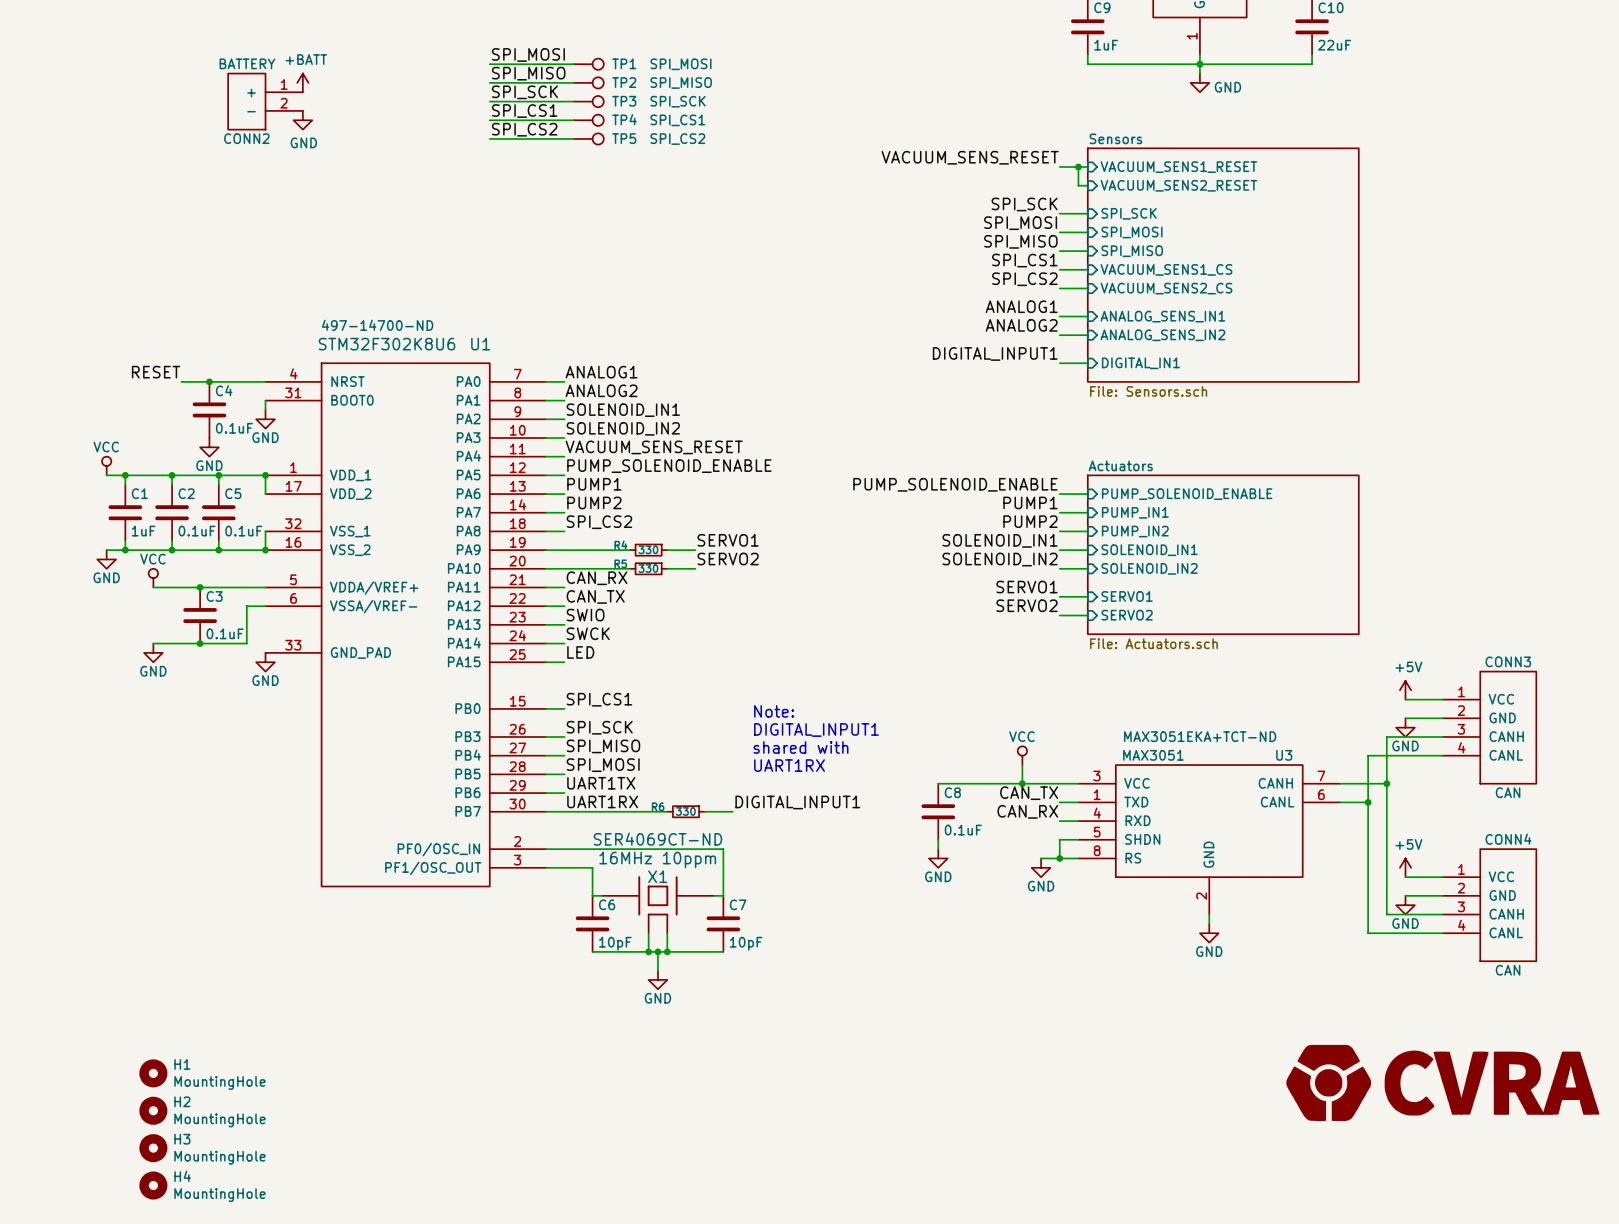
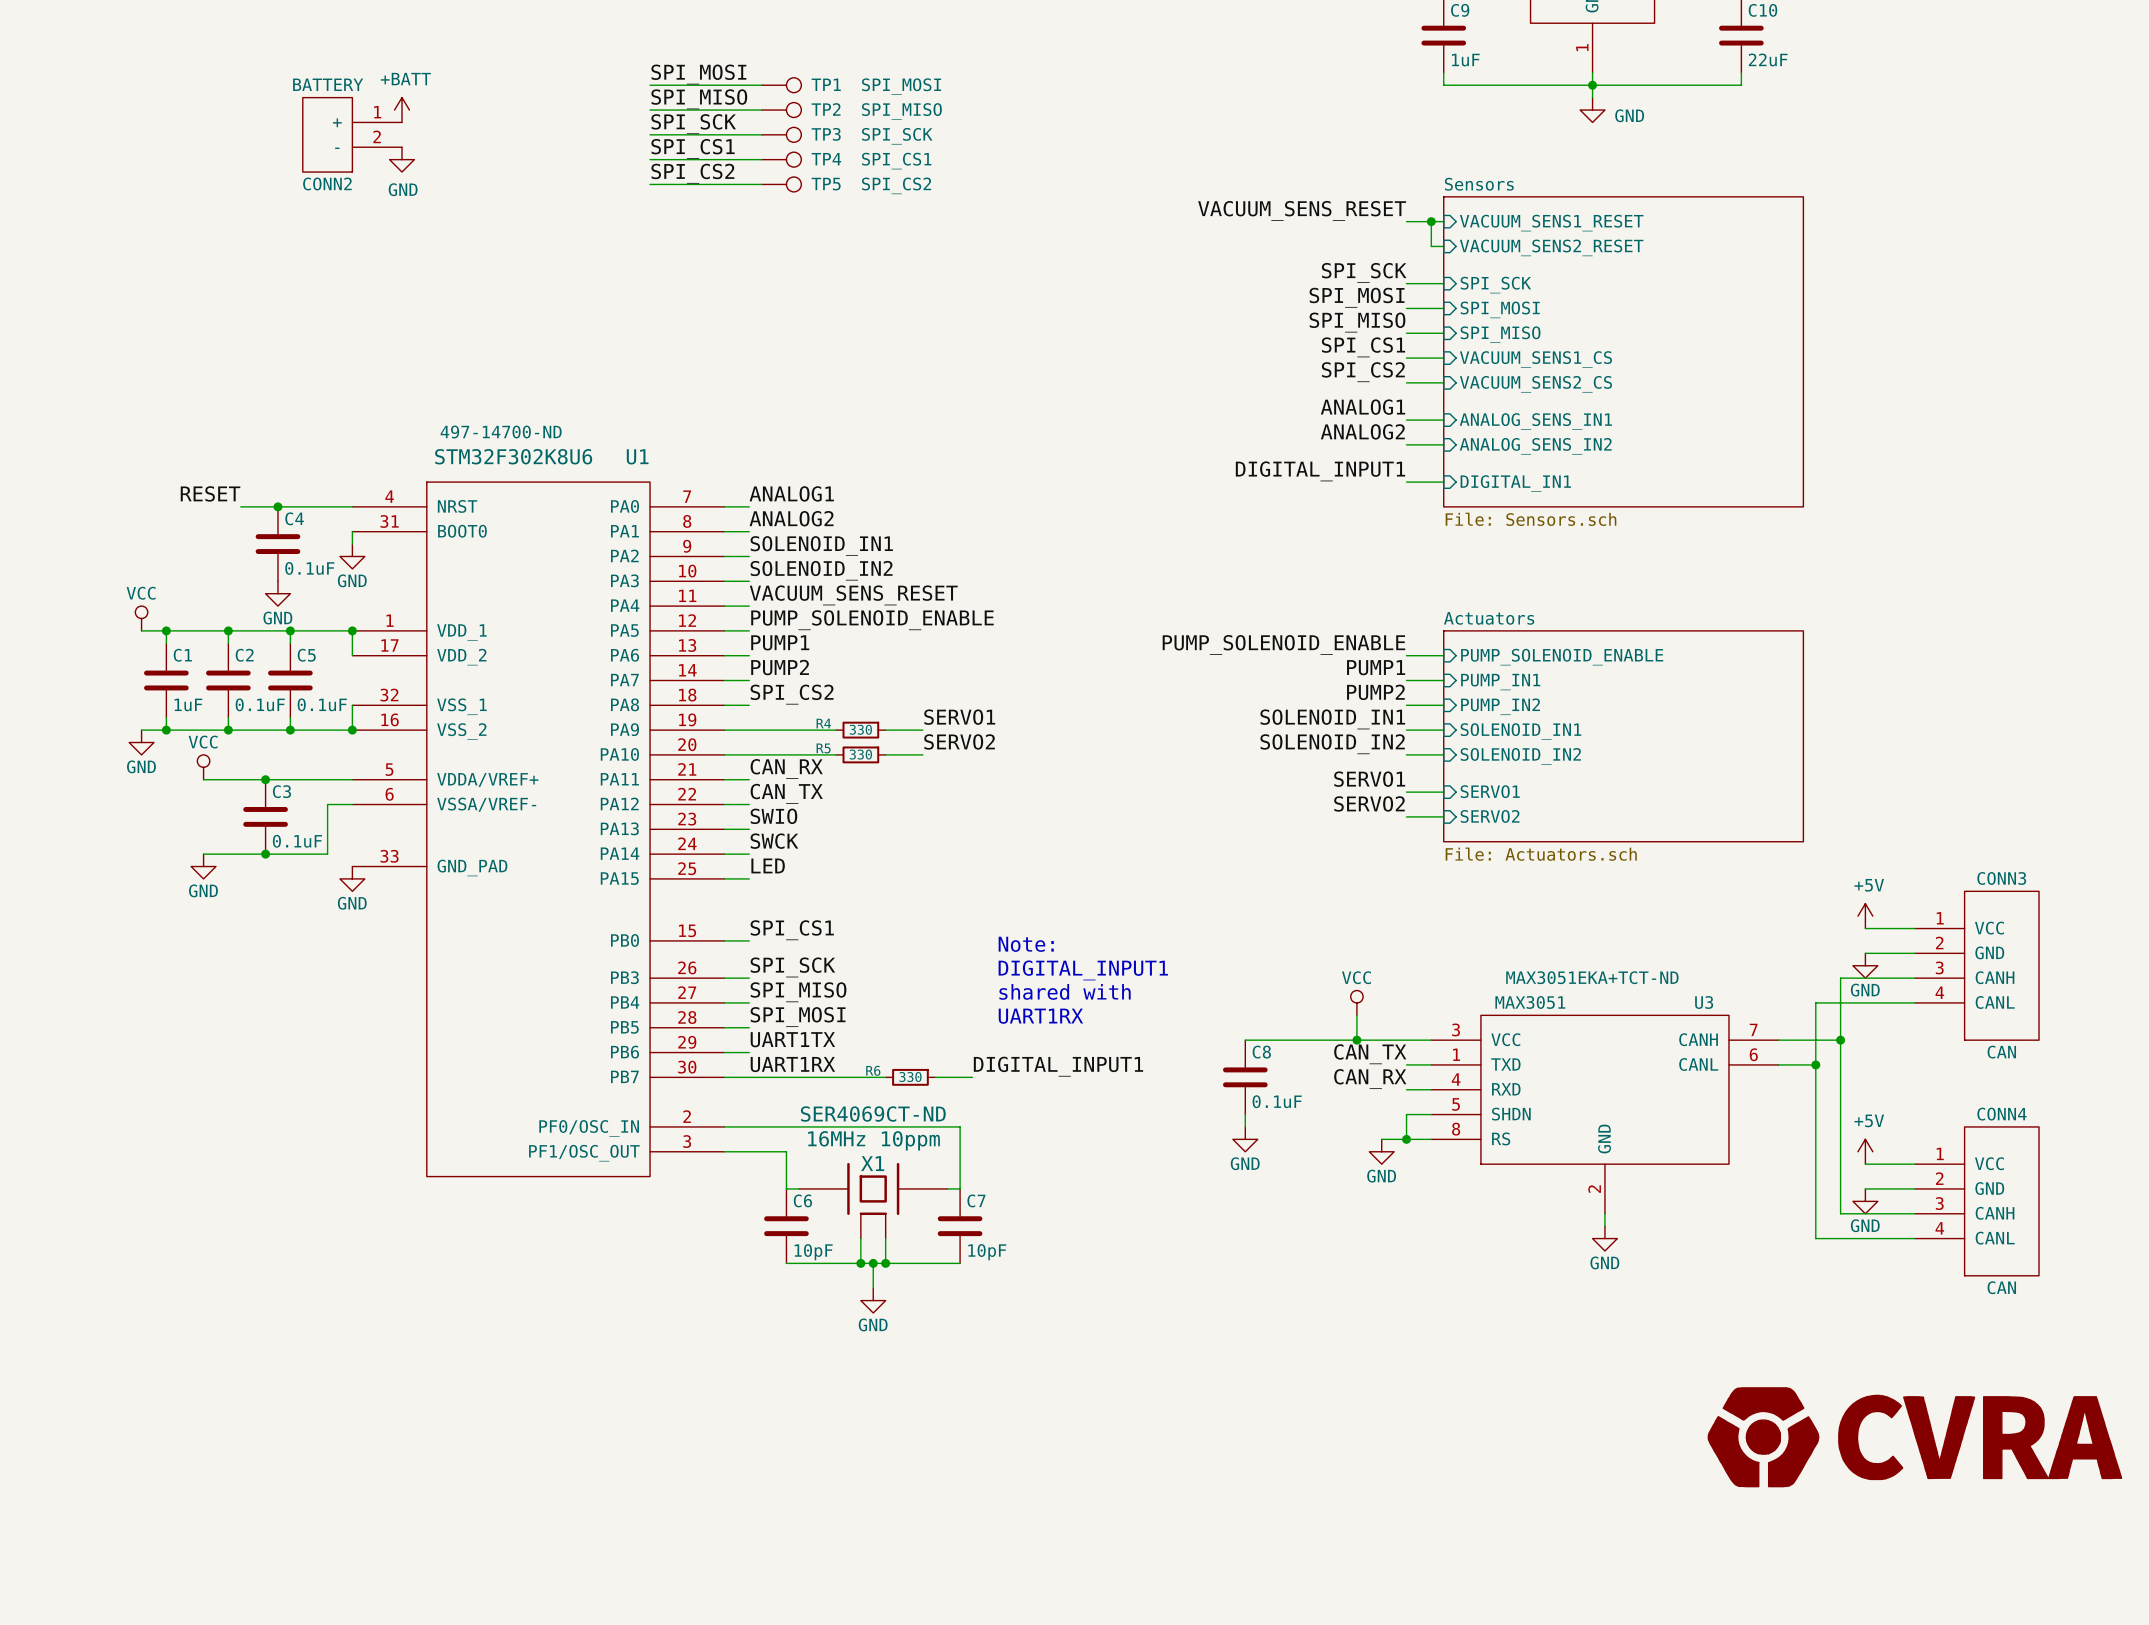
H1: MountingHole (153, 1073) -> none
H2: MountingHole (153, 1110) -> none
H3: MountingHole (153, 1148) -> none
H4: MountingHole (153, 1185) -> none

